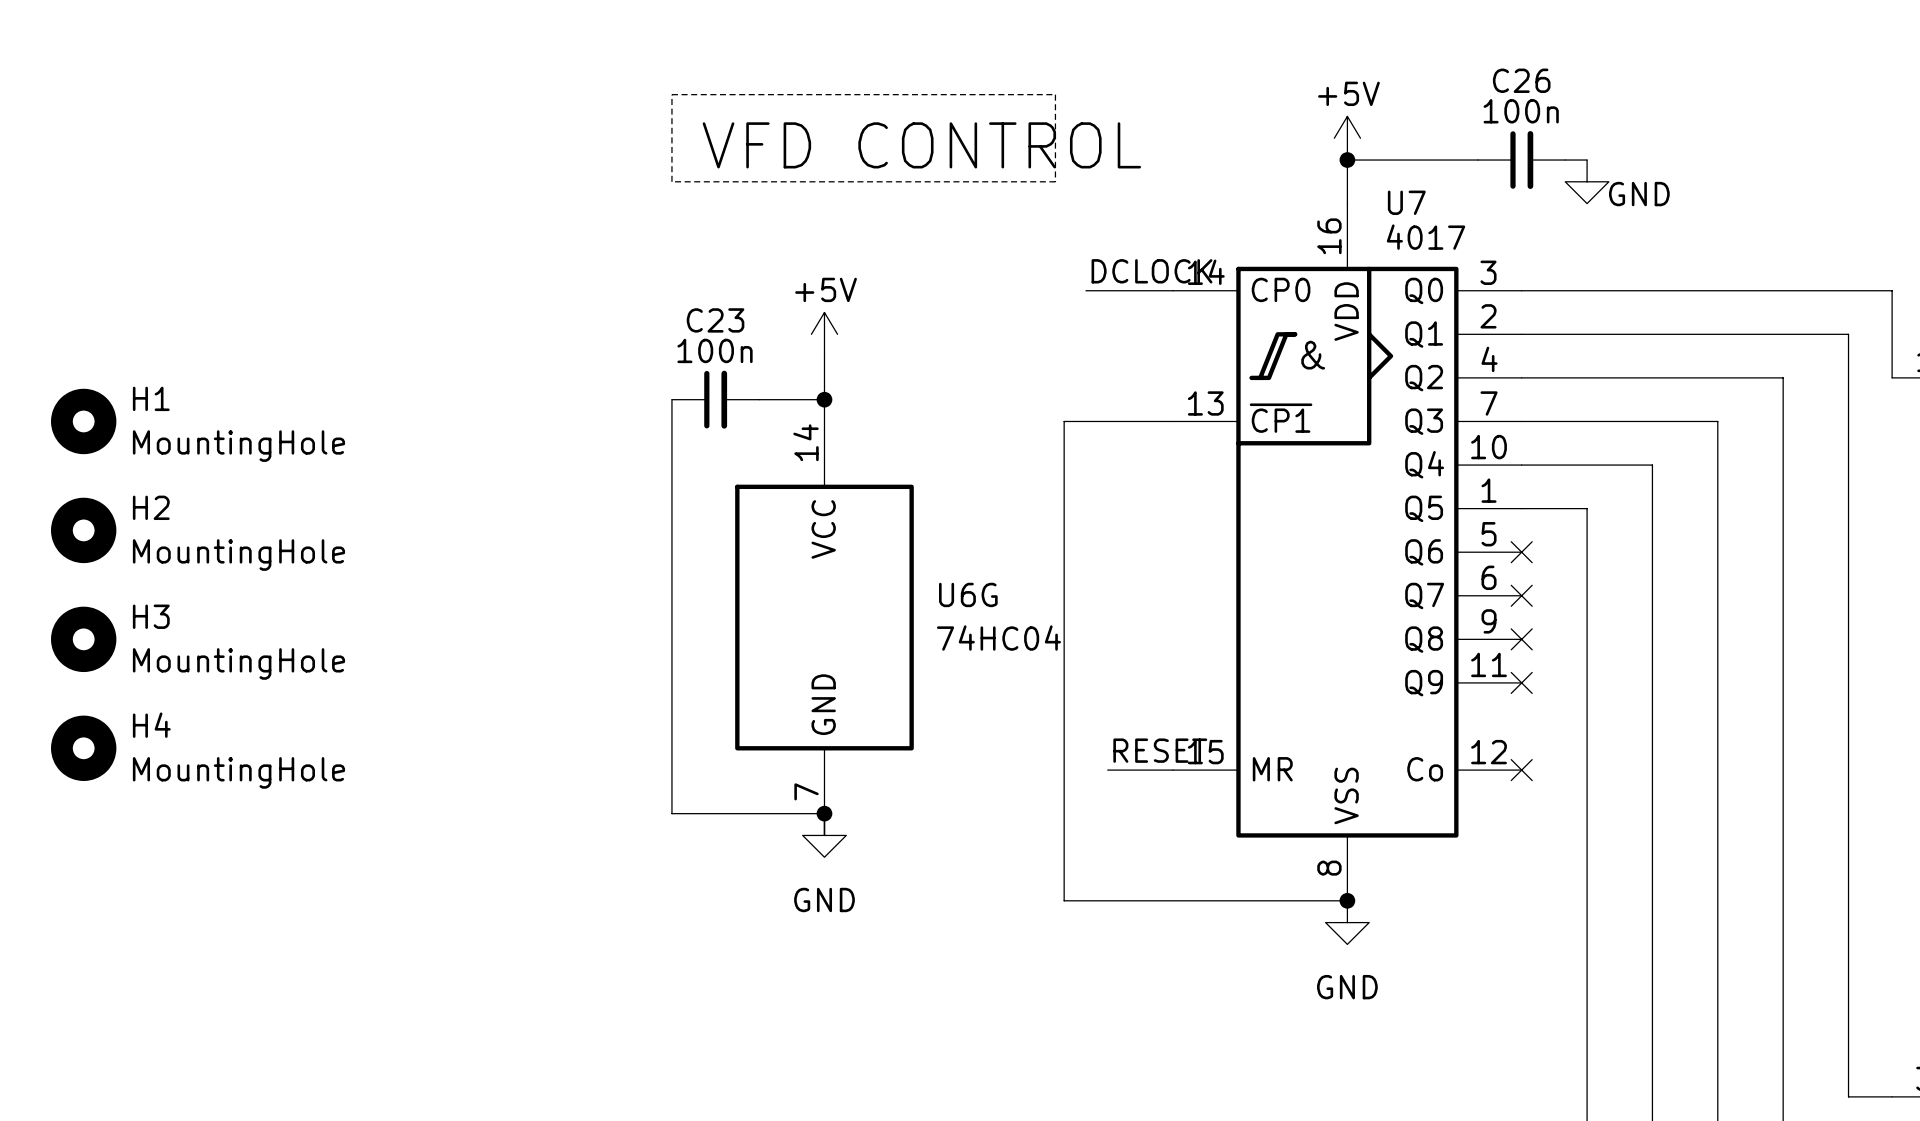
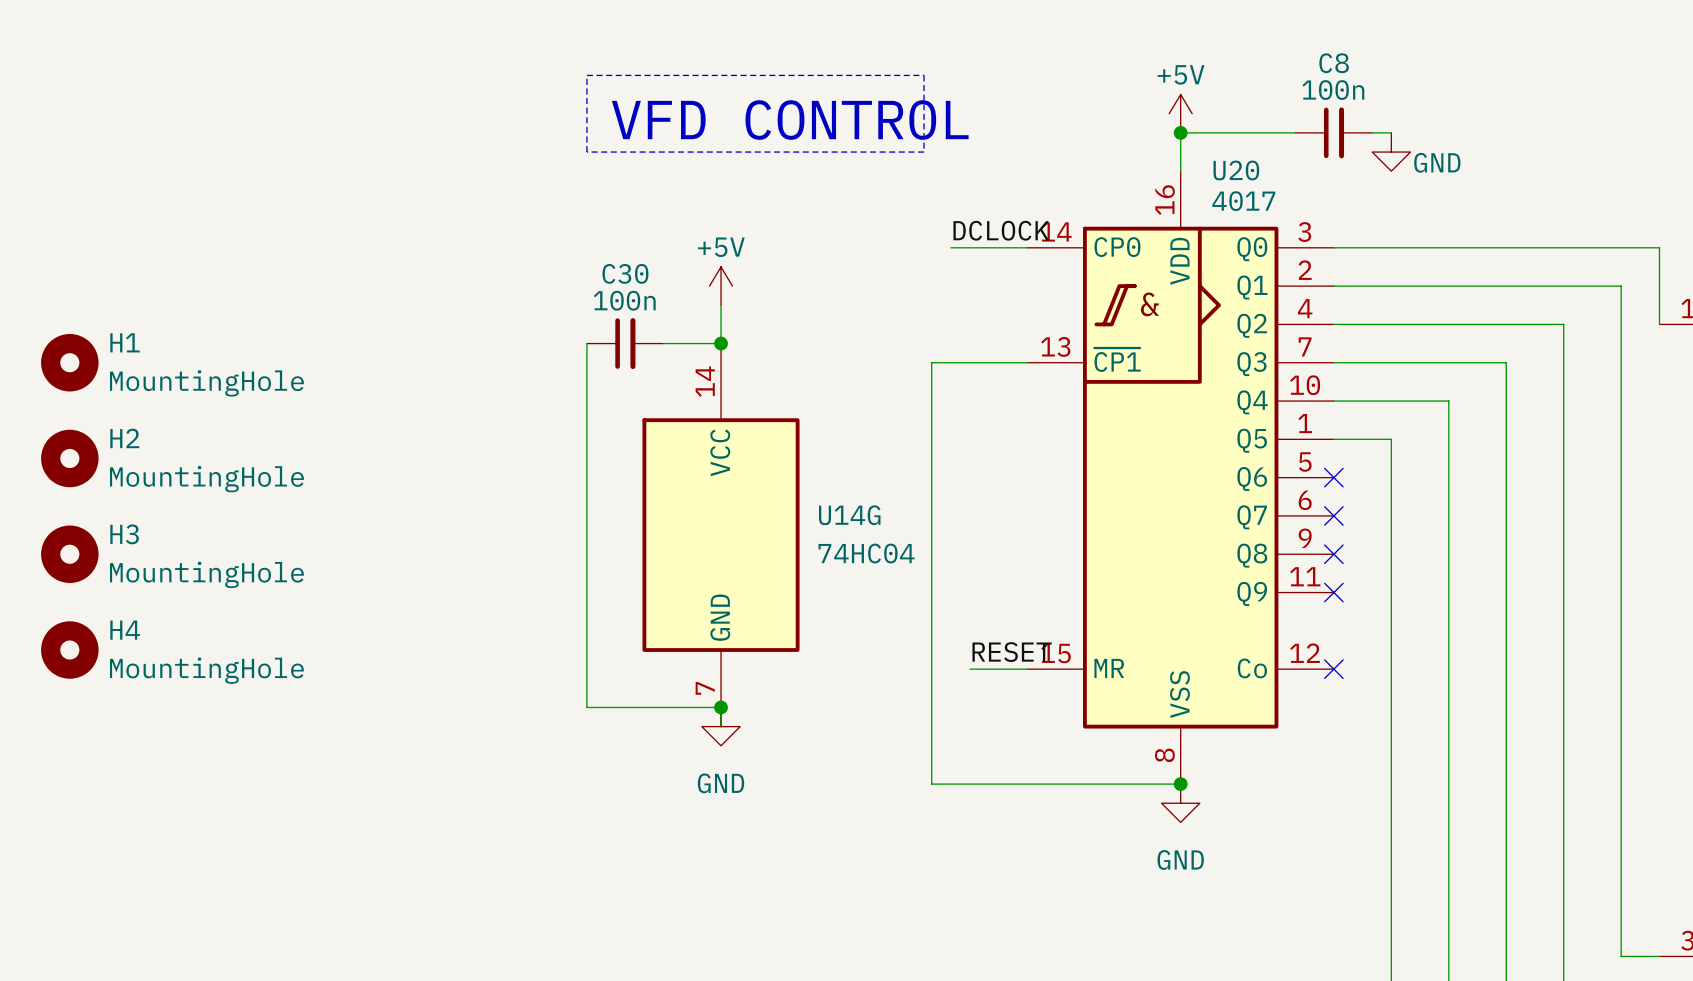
C26 name: C26 (1521, 80) -> C8 (1334, 63)
U7 name: U7 (1406, 202) -> U20 (1236, 170)
C23 name: C23 (715, 320) -> C30 (625, 273)
U6G name: U6G (968, 594) -> U14G (849, 515)

